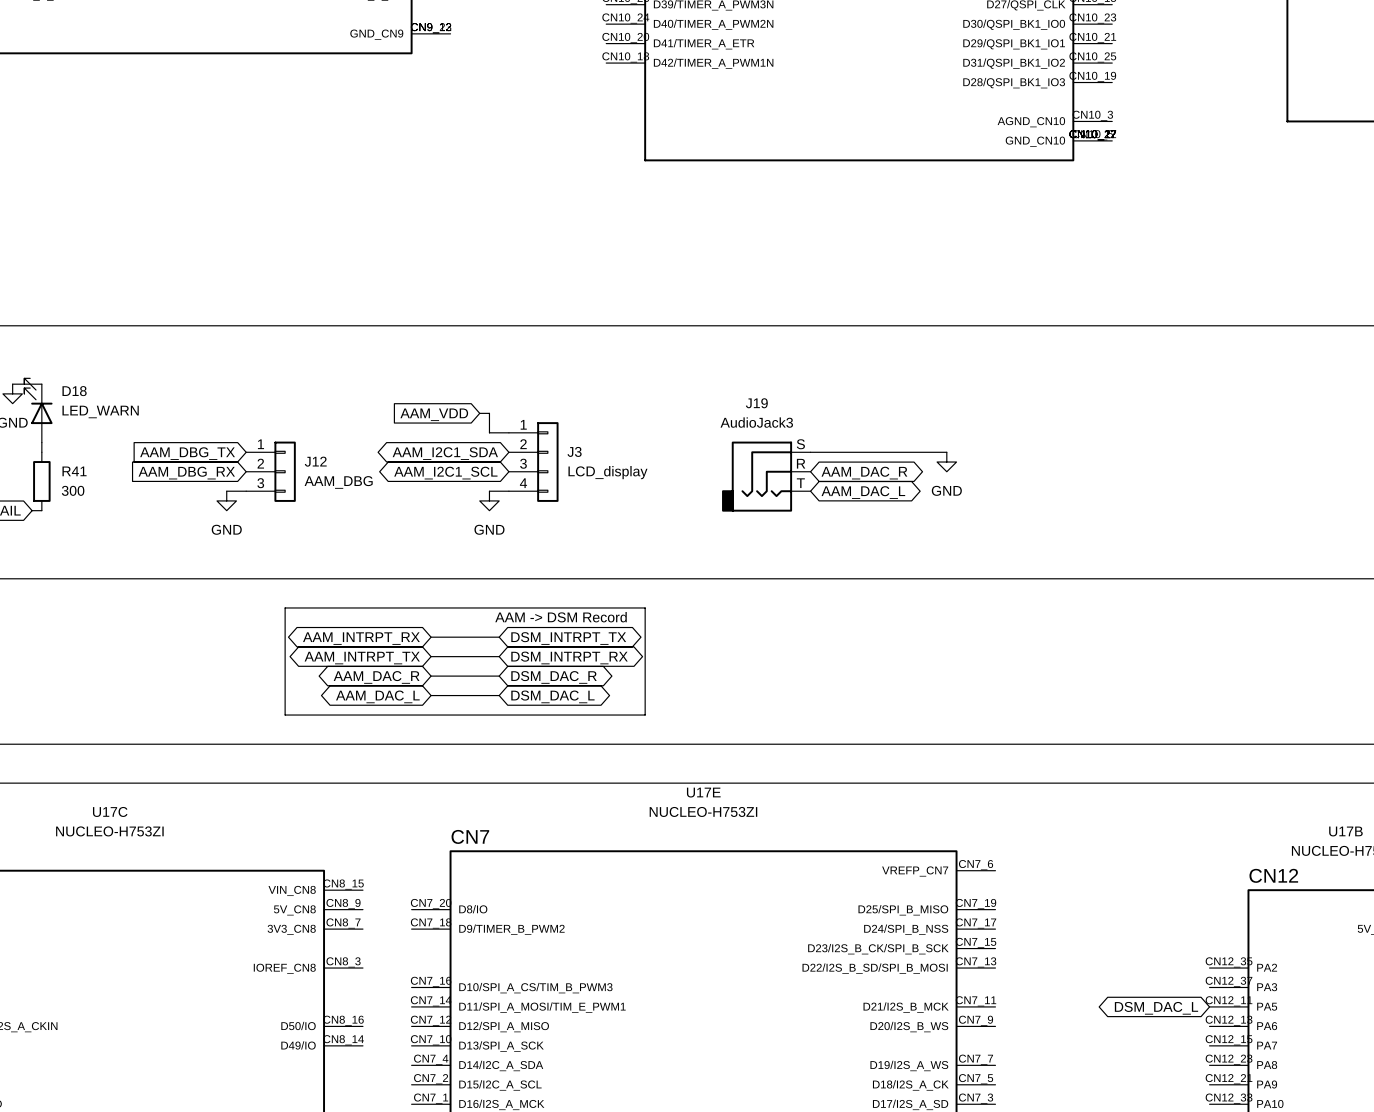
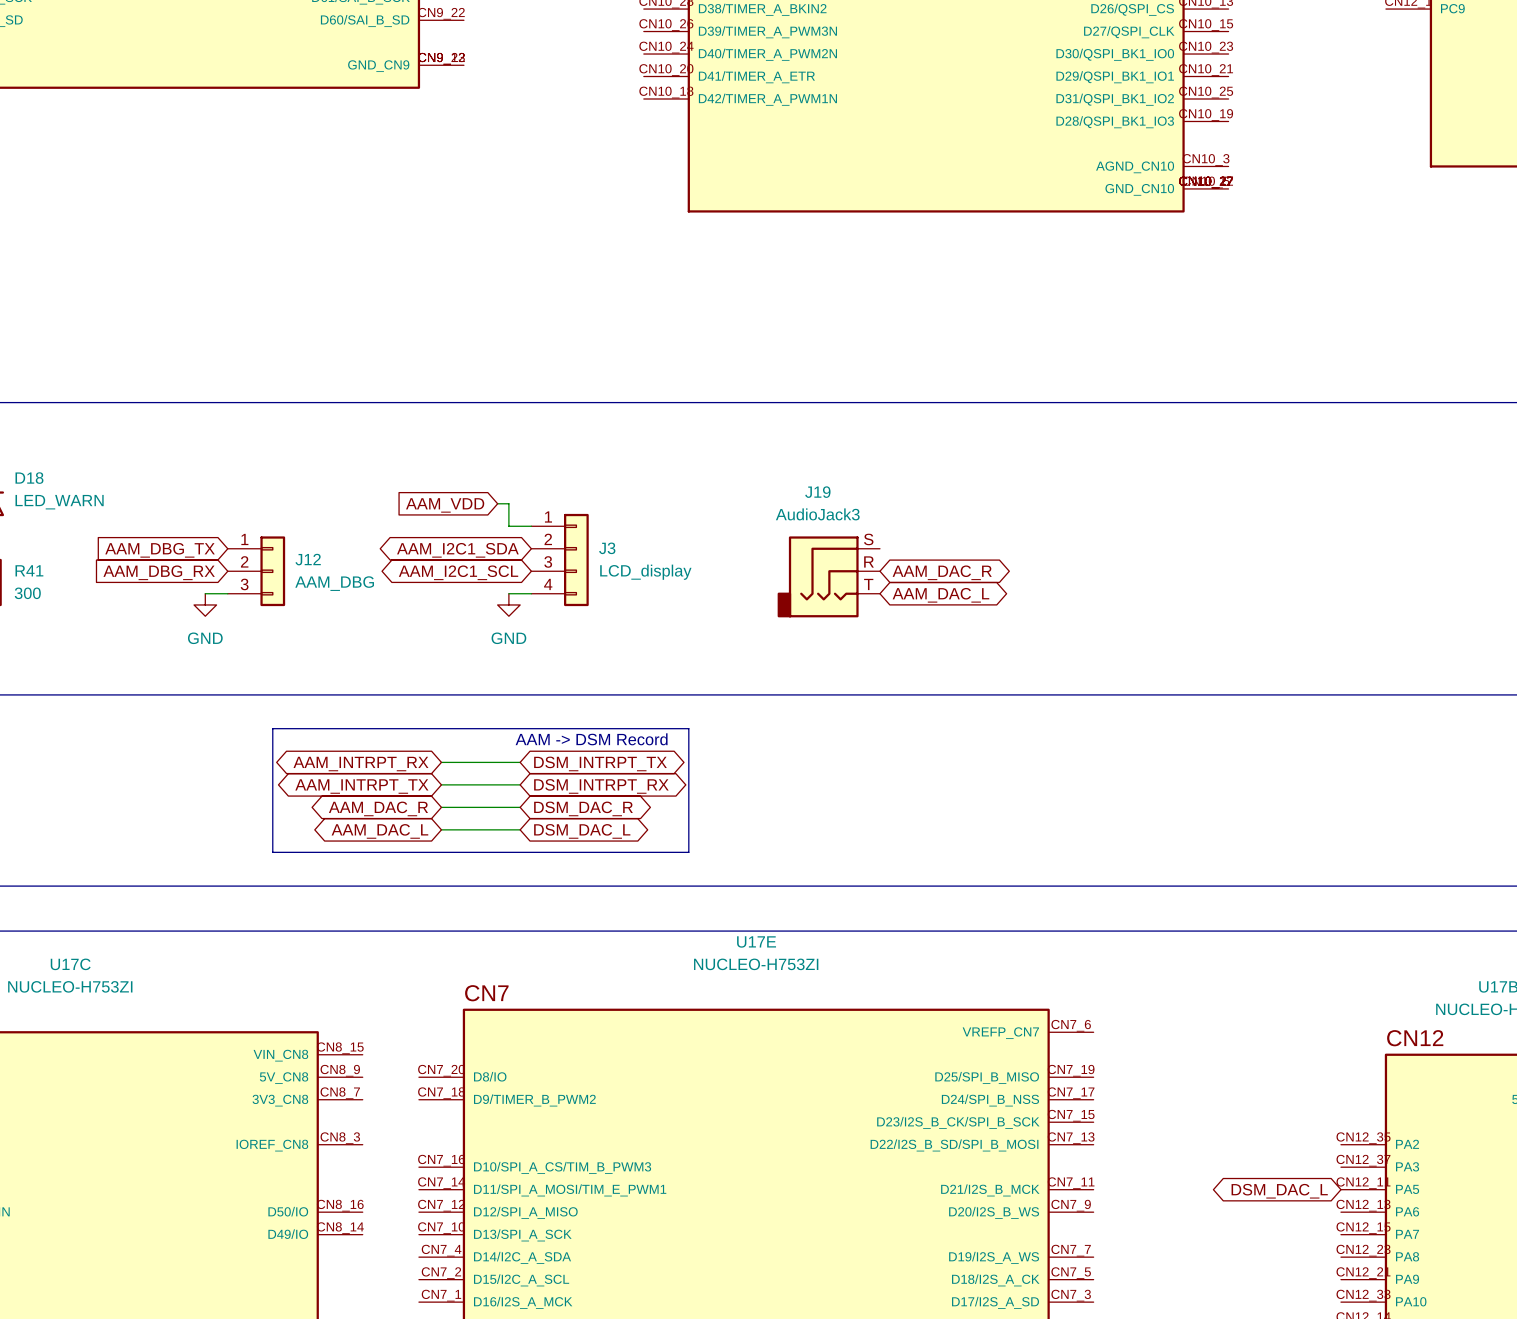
wire: (810, 452) (946, 452) -> none
power symbol: GND (946, 462) -> none

